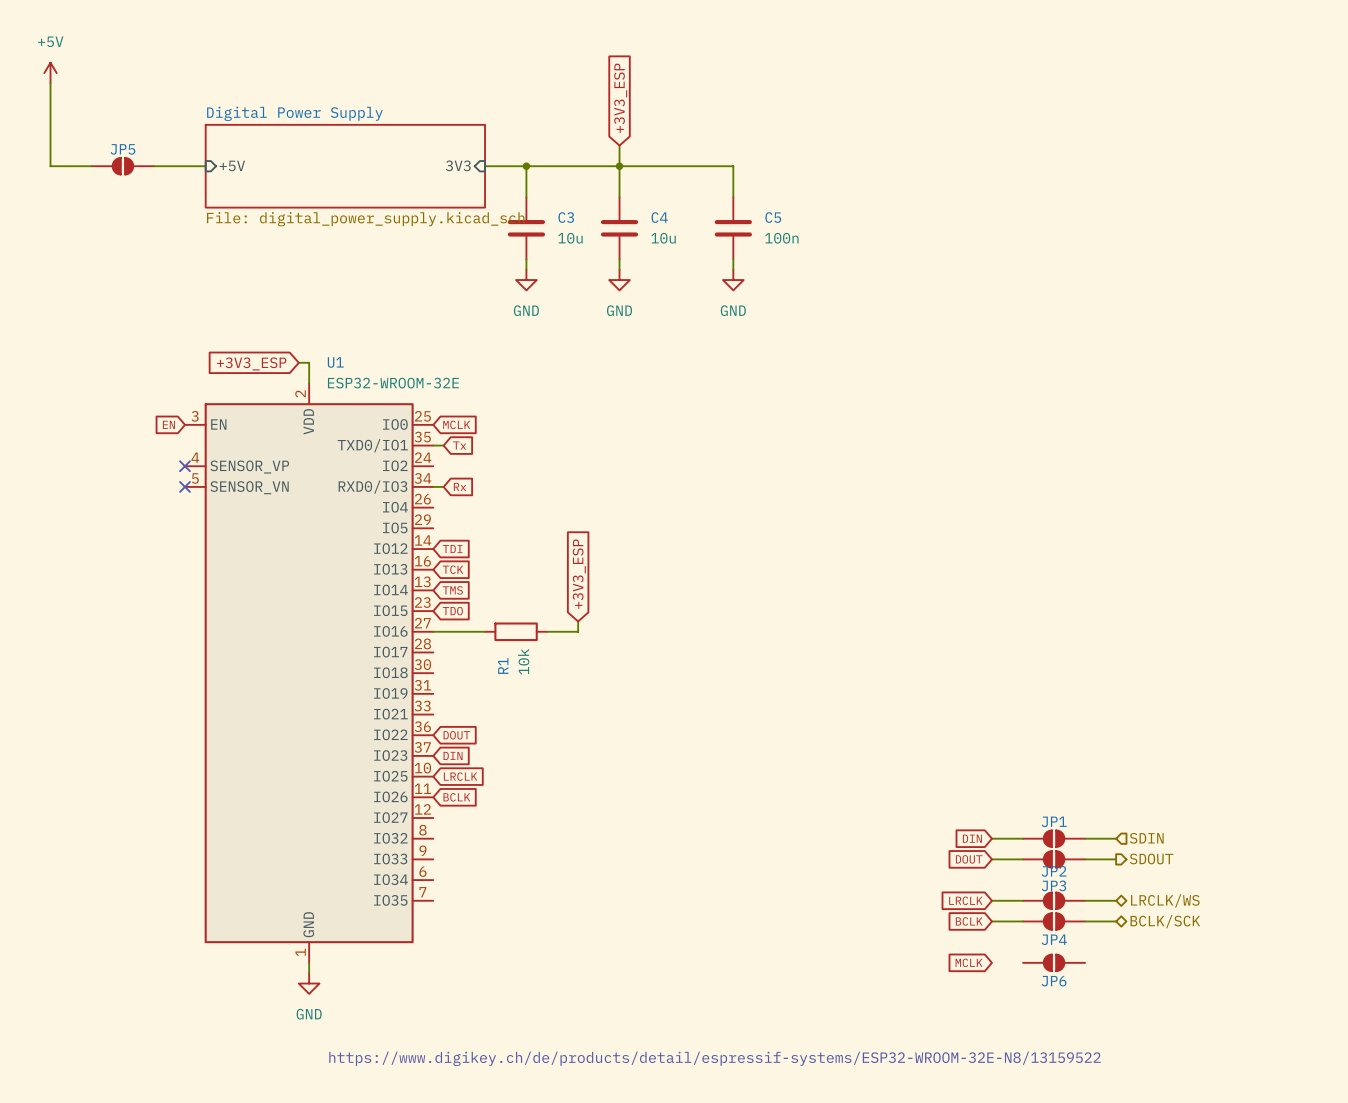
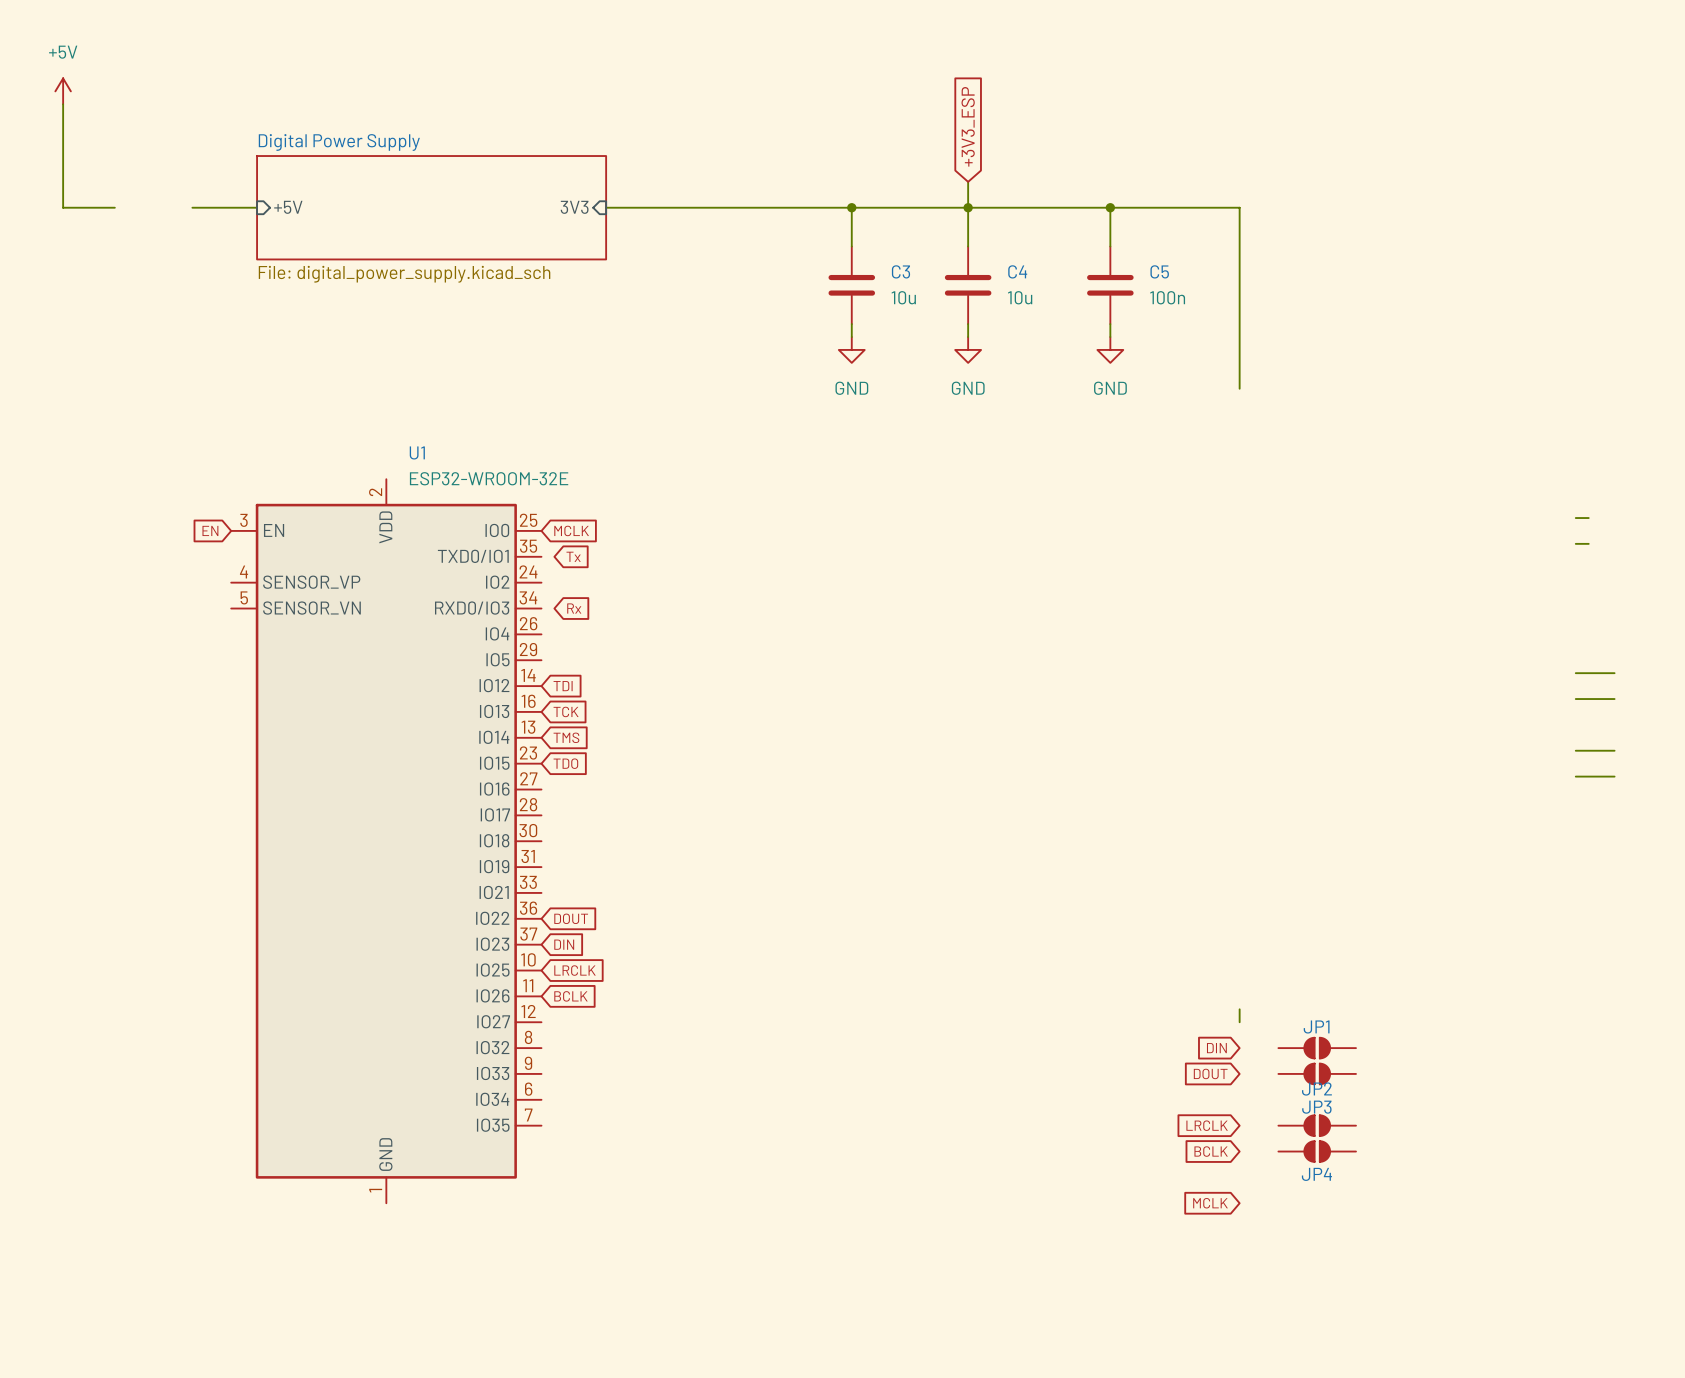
global label position: +3V3_ESP (620, 98) -> +3V3_ESP (968, 126)
wire: (619, 145) (619, 197) -> (968, 181) (968, 246)
JP5: (122, 166) -> none
wire: (526, 166) (526, 197) -> (851, 207) (851, 246)
junction: (526, 166) -> none
junction: (619, 166) -> none
junction: none -> (851, 207)
wire: (733, 166) (733, 197) -> (916, 207) (1239, 207) (1239, 388)
junction: none -> (968, 207)
wire: none -> (1110, 207) (1110, 246)
junction: none -> (1110, 207)
C3 position: (526, 228) -> (851, 285)
C4 position: (619, 228) -> (968, 285)
C5 position: (733, 228) -> (1110, 285)
wire: (526, 259) (526, 269) -> (851, 324) (851, 337)
wire: (619, 259) (619, 269) -> (968, 324) (968, 337)
wire: (733, 259) (733, 269) -> (1110, 324) (1110, 337)
power symbol: GND (526, 280) -> none
power symbol: GND (619, 280) -> none
power symbol: none -> GND (851, 349)
power symbol: GND (733, 280) -> none
power symbol: none -> GND (968, 349)
power symbol: none -> GND (1110, 349)
wire: (298, 362) (309, 362) (309, 383) -> none
global label: +3V3_ESP (251, 363) -> none
wire: none -> (1575, 518) (1588, 518)
wire: none -> (1575, 543) (1588, 543)
wire: (433, 445) (443, 445) -> none
no-connect mark: (185, 466) -> none
no-connect mark: (185, 486) -> none
wire: (433, 486) (443, 486) -> none
wire: none -> (1575, 673) (1614, 673)
wire: none -> (1575, 699) (1614, 699)
global label: +3V3_ESP (579, 574) -> none
wire: none -> (1575, 750) (1614, 750)
wire: (578, 621) (578, 631) (547, 631) -> none
wire: none -> (1575, 776) (1614, 776)
wire: (433, 631) (485, 631) -> none
R1: 10k (516, 631) -> none
wire: none -> (1239, 1009) (1239, 1022)
wire: (991, 838) (1023, 838) -> none
wire: (1085, 838) (1116, 838) -> none
hierarchical label: SDIN (1146, 838) -> none
wire: (991, 859) (1023, 859) -> none
wire: (1085, 859) (1116, 859) -> none
hierarchical label: SDOUT (1151, 859) -> none
wire: (991, 900) (1023, 900) -> none
wire: (1085, 900) (1116, 900) -> none
hierarchical label: LRCLK/WS (1165, 900) -> none
wire: (991, 921) (1023, 921) -> none
wire: (1085, 921) (1116, 921) -> none
hierarchical label: BCLK/SCK (1165, 921) -> none
wire: (309, 962) (309, 973) -> none
JP6: (1054, 962) -> none
power symbol: GND (309, 983) -> none
text: https://www.digikey.ch/de/products/detail/espressif-systems/ESP32-WROOM-32E-N8/13159522 (714, 1058) -> none

